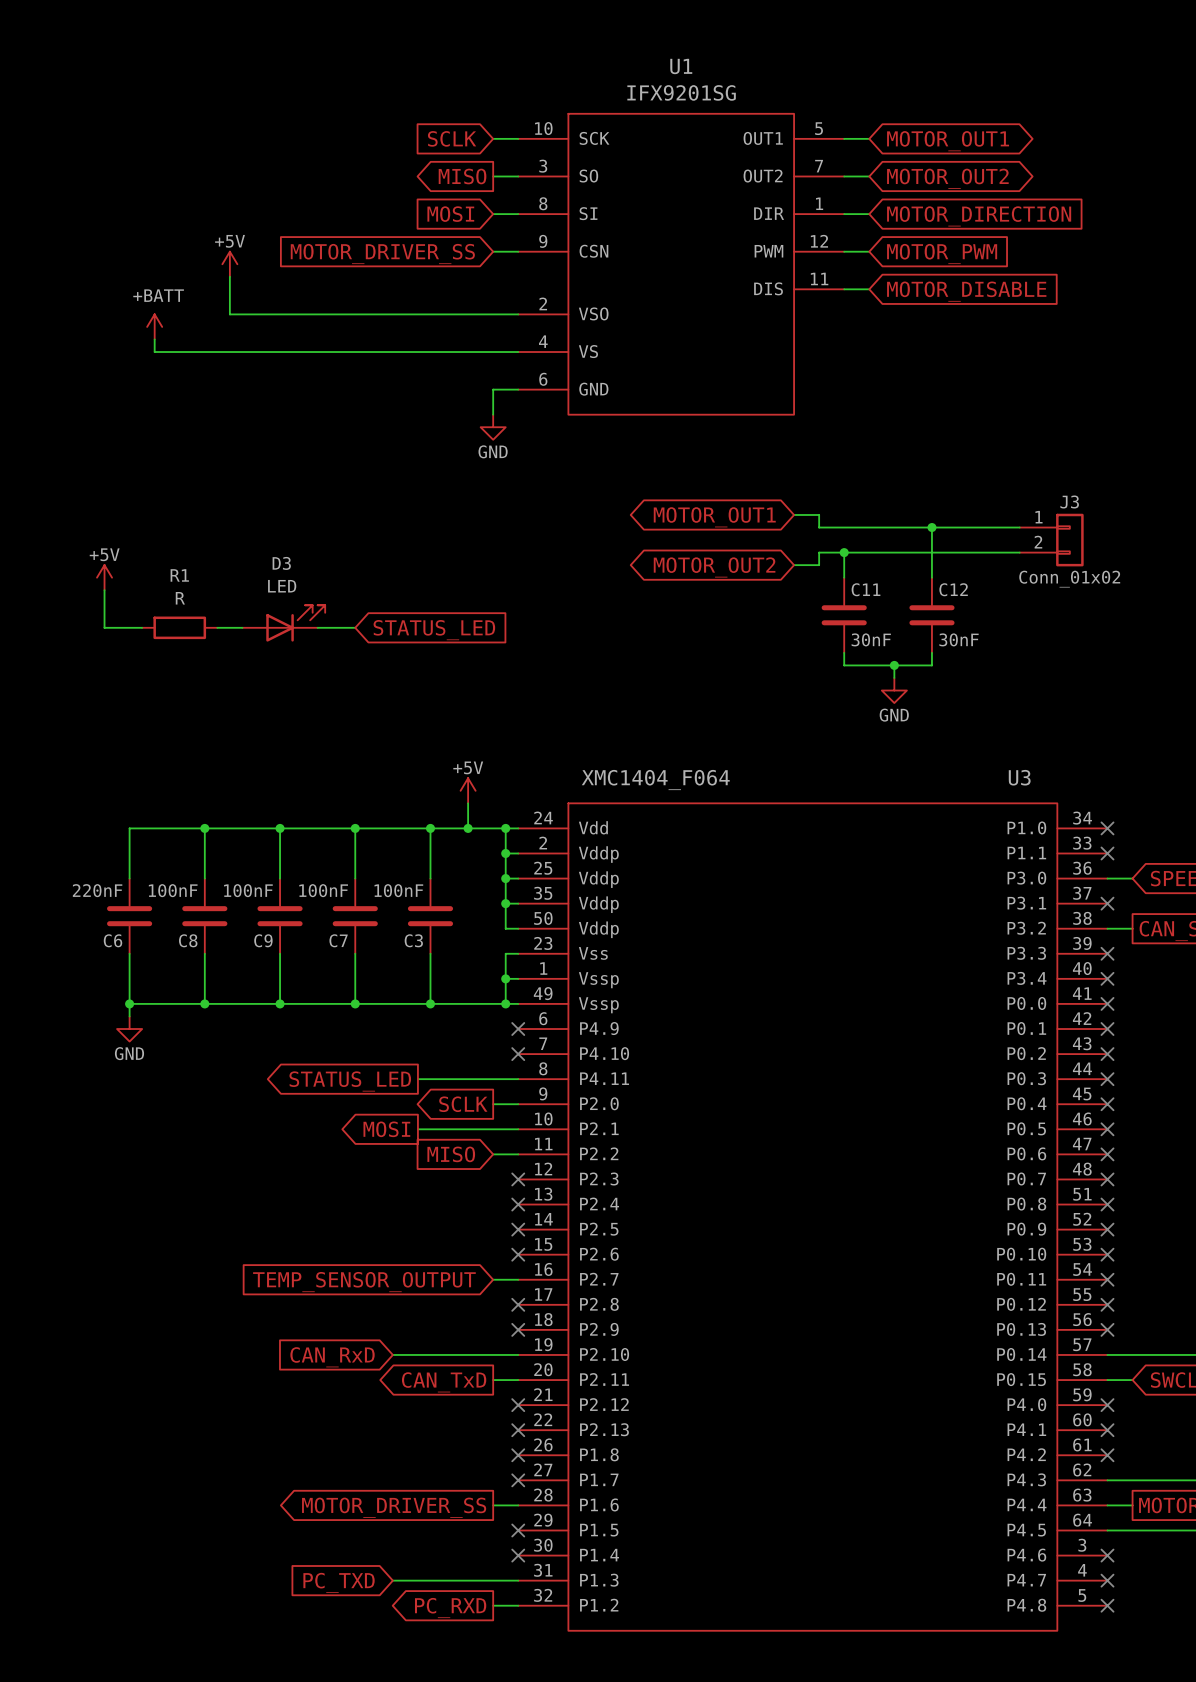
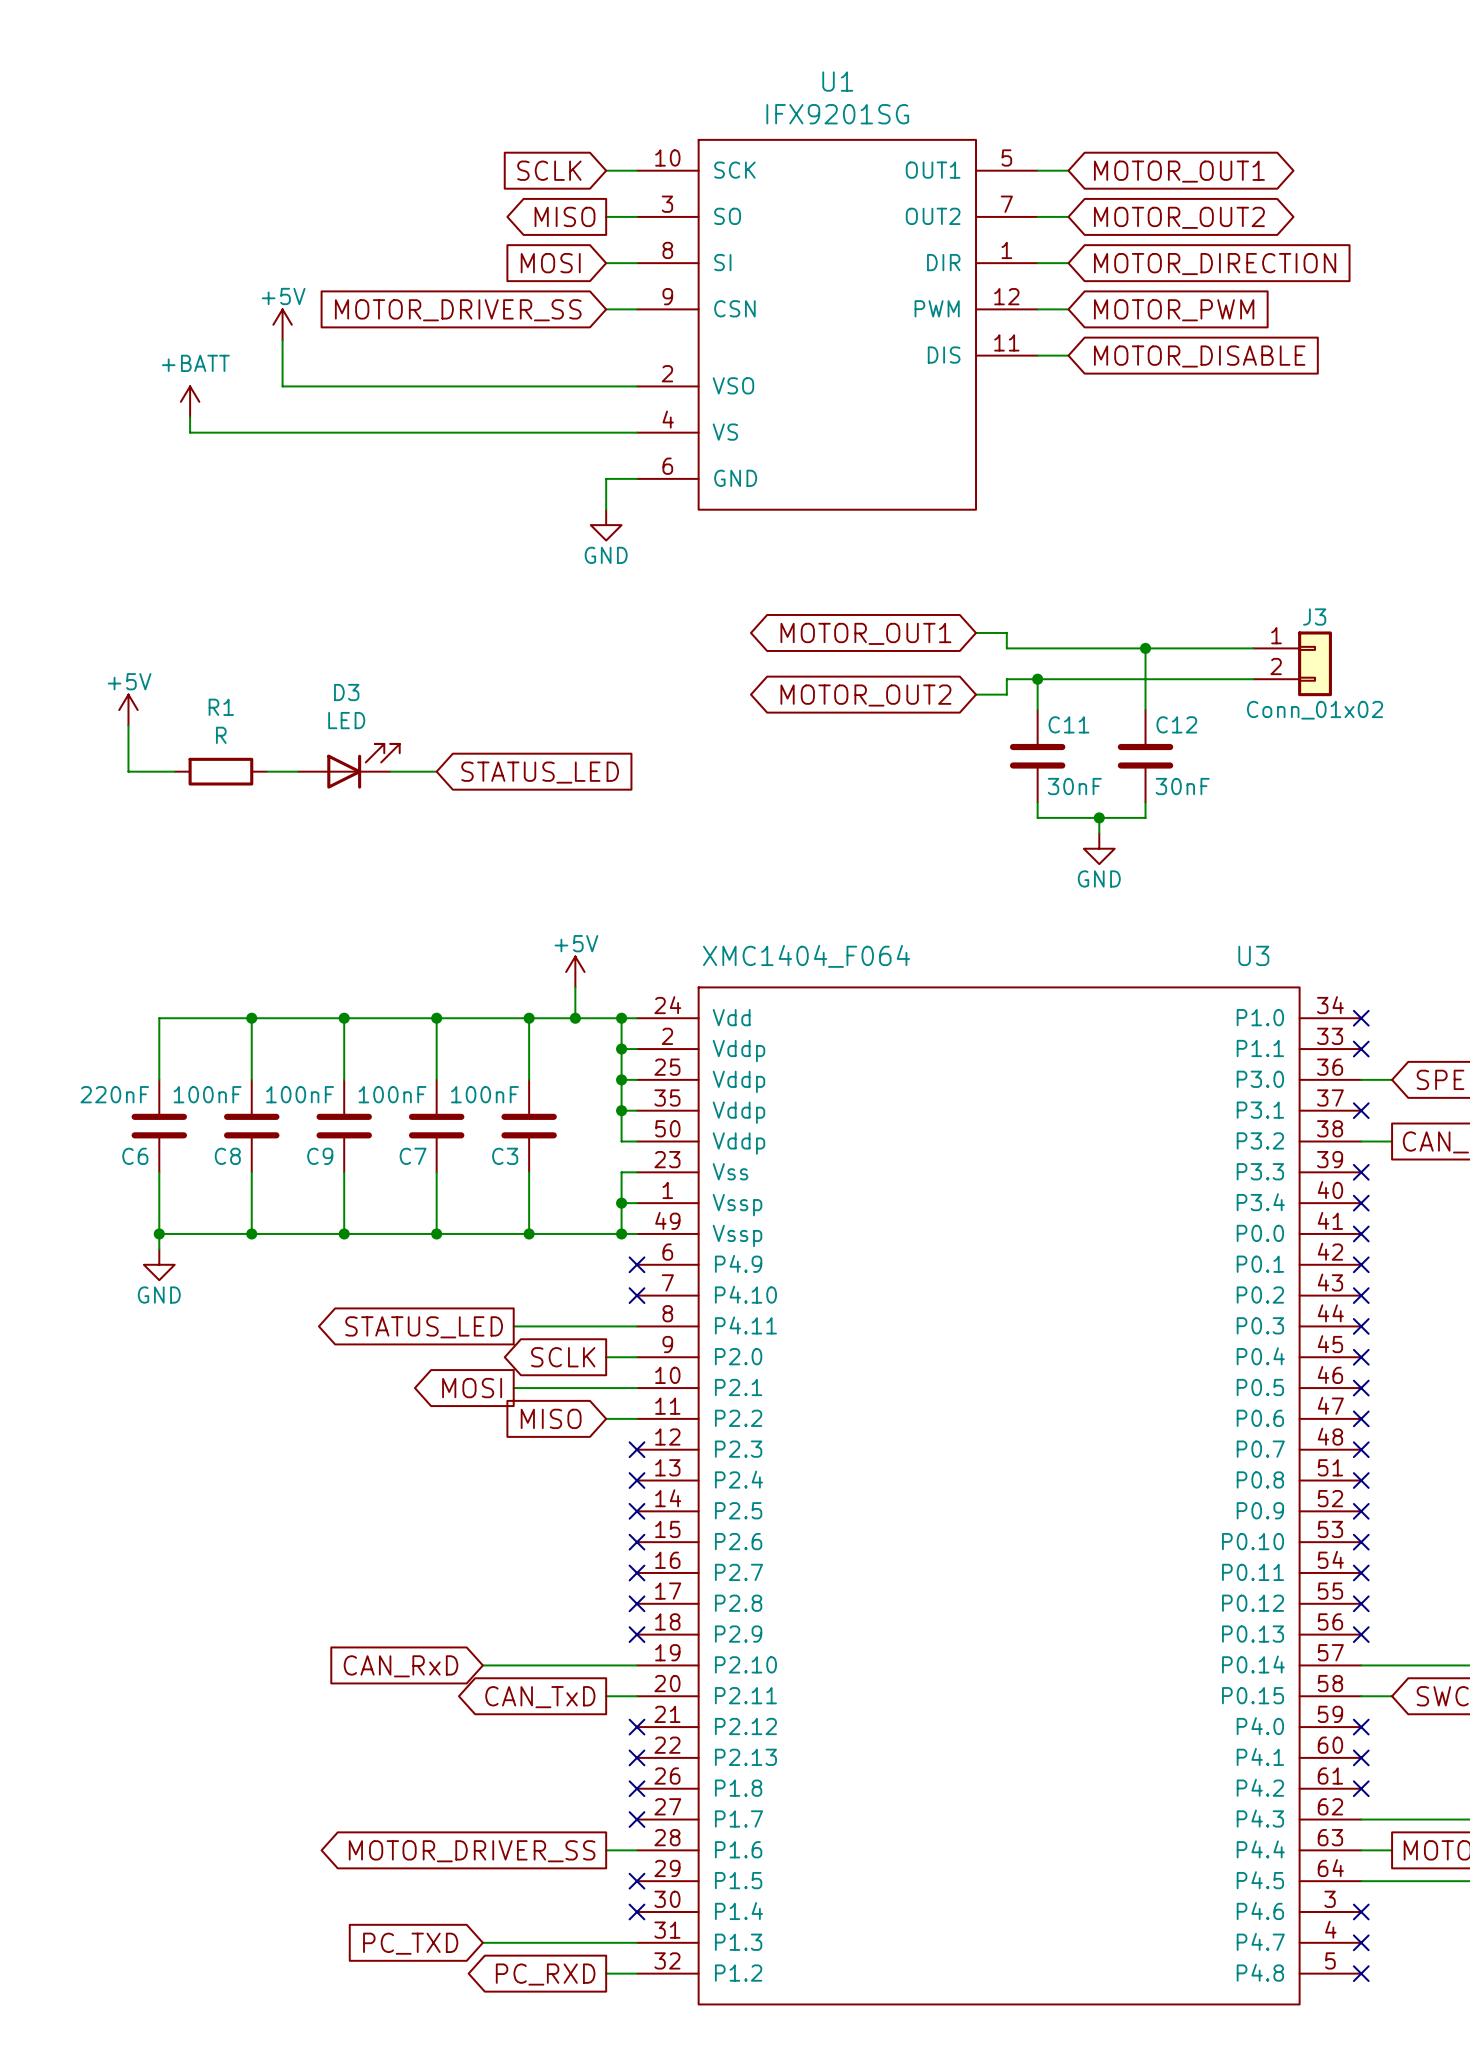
wire: (493, 1279) (518, 1279) -> none
no-connect mark: none -> (636, 1572)
global label: TEMP_SENSOR_OUTPUT (364, 1282) -> none

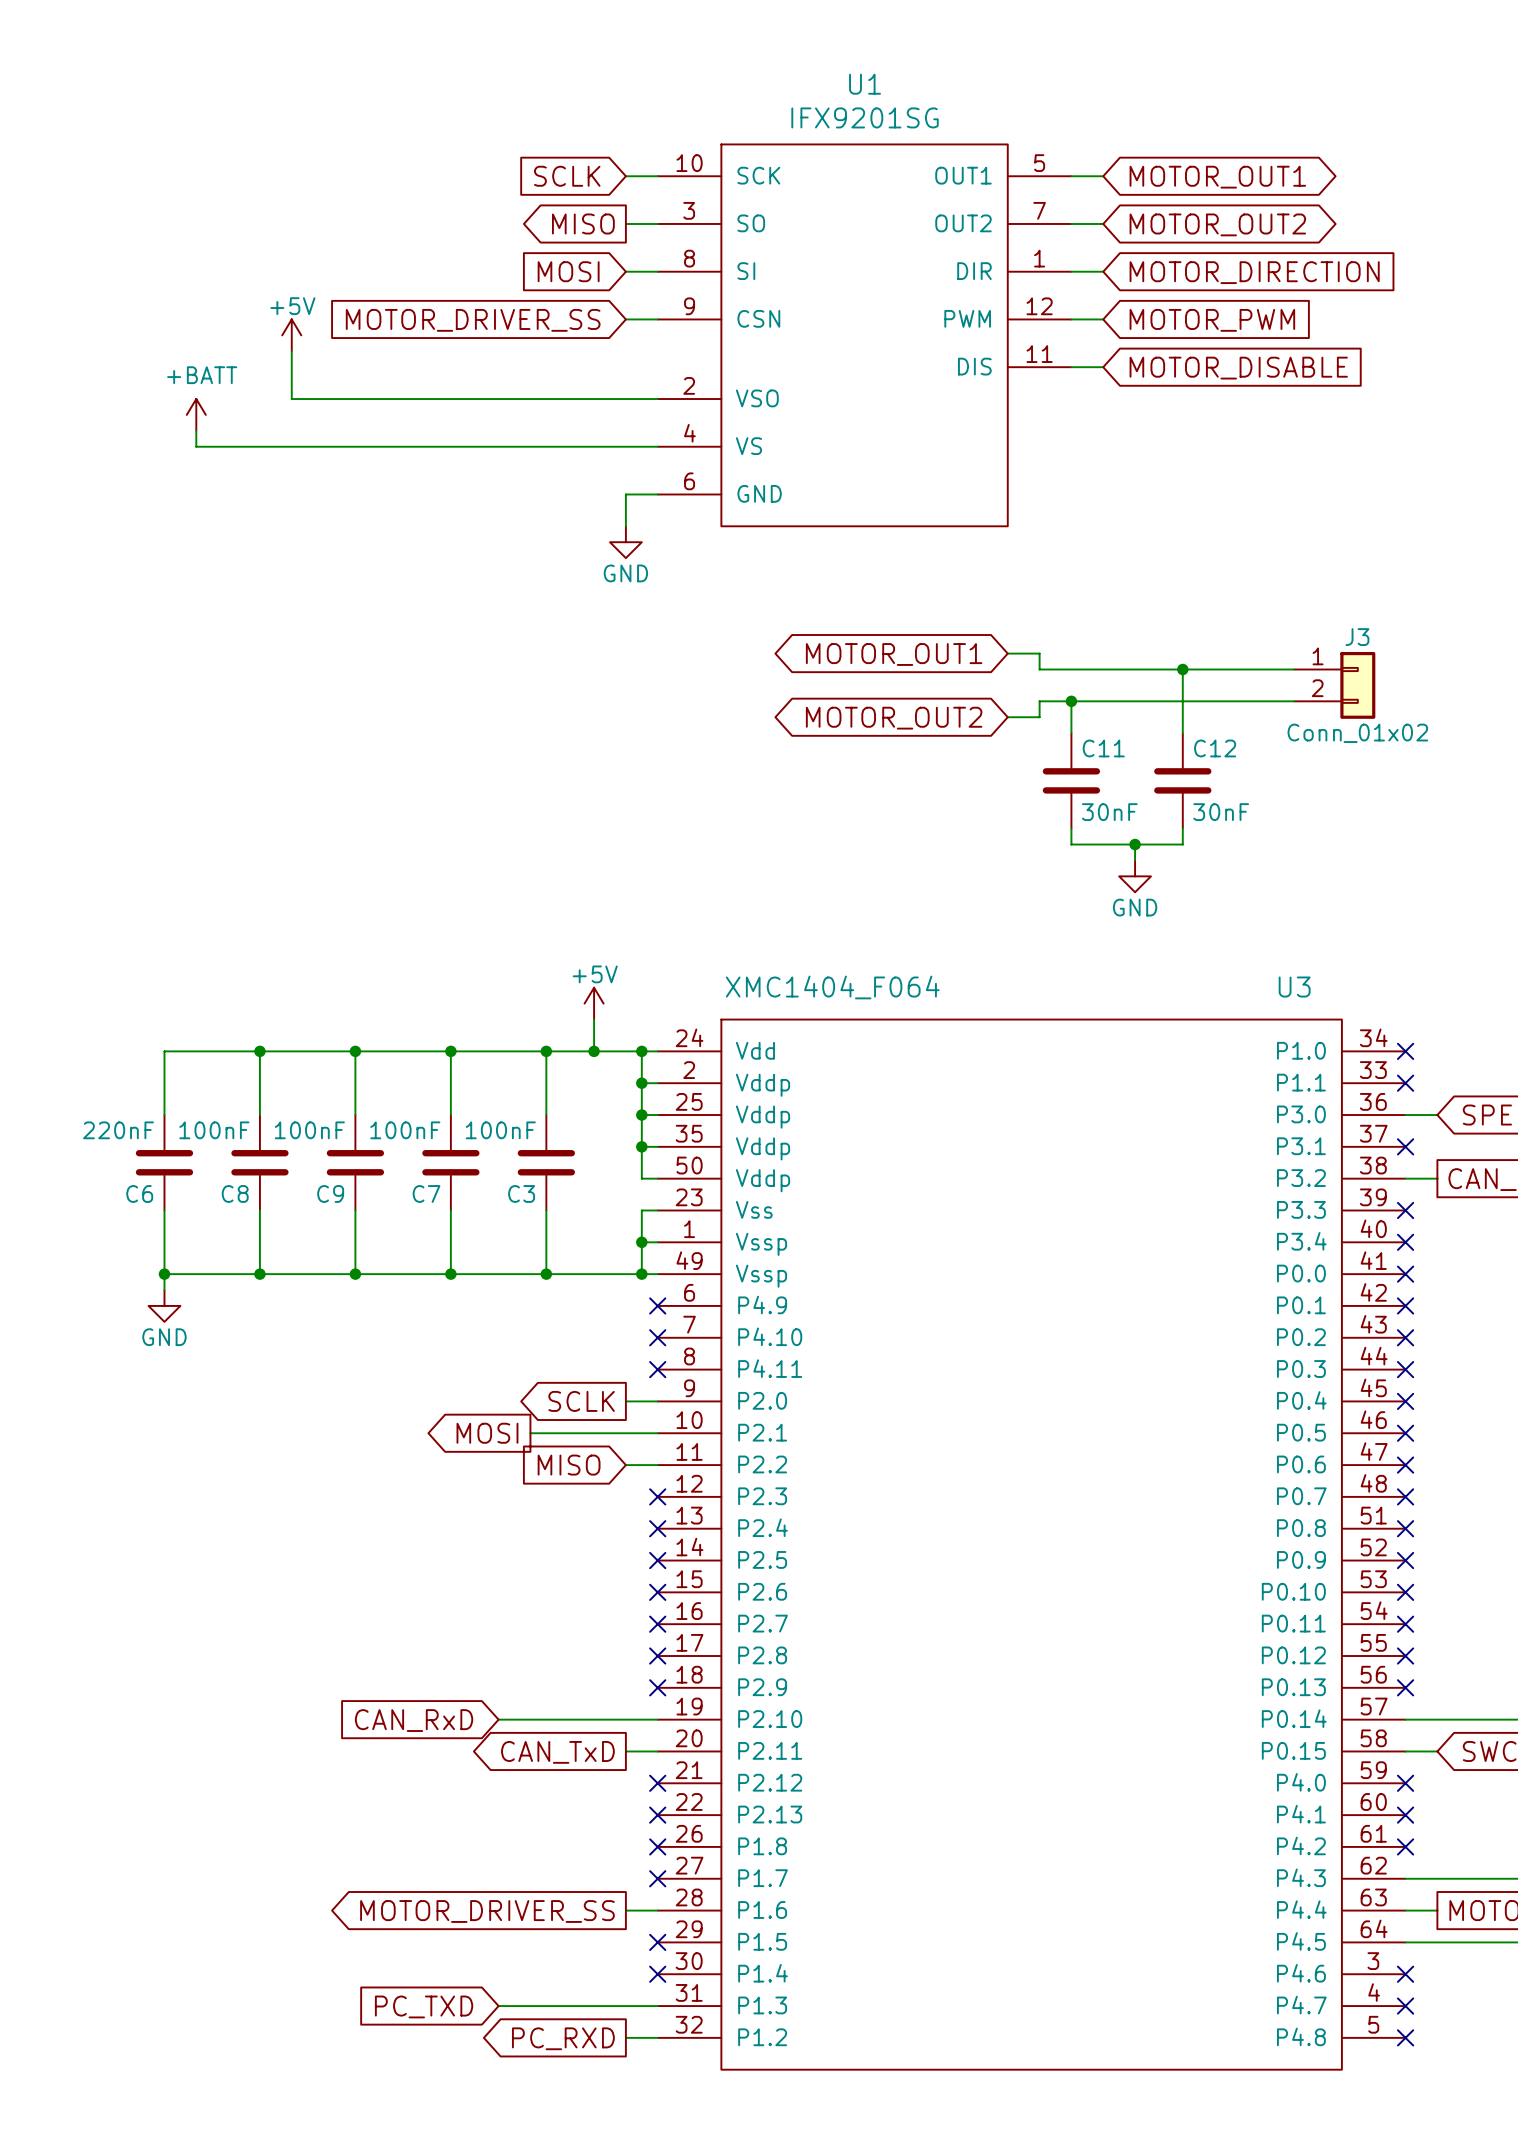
power symbol: +5V (128, 710) -> none
wire: (128, 725) (128, 771) (174, 771) -> none
D3: LED (348, 766) -> none
R1: R (220, 771) -> none
wire: (267, 771) (297, 771) -> none
wire: (390, 771) (436, 771) -> none
global label: STATUS_LED (540, 772) -> none
wire: (513, 1326) (636, 1326) -> none
no-connect mark: none -> (657, 1369)
global label: STATUS_LED (424, 1327) -> none

